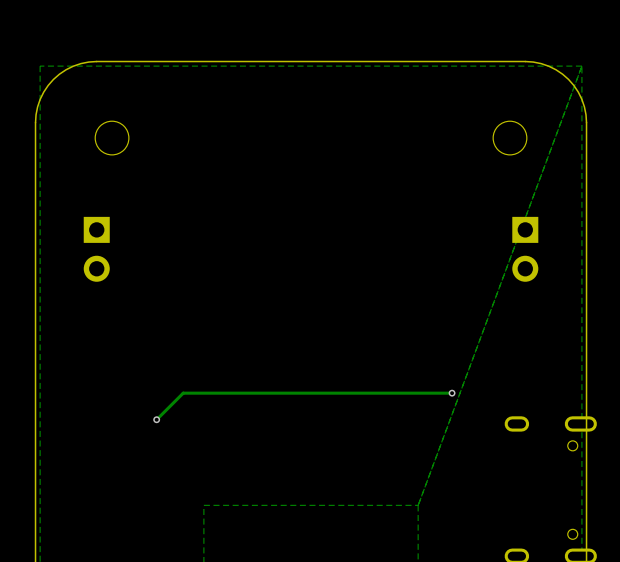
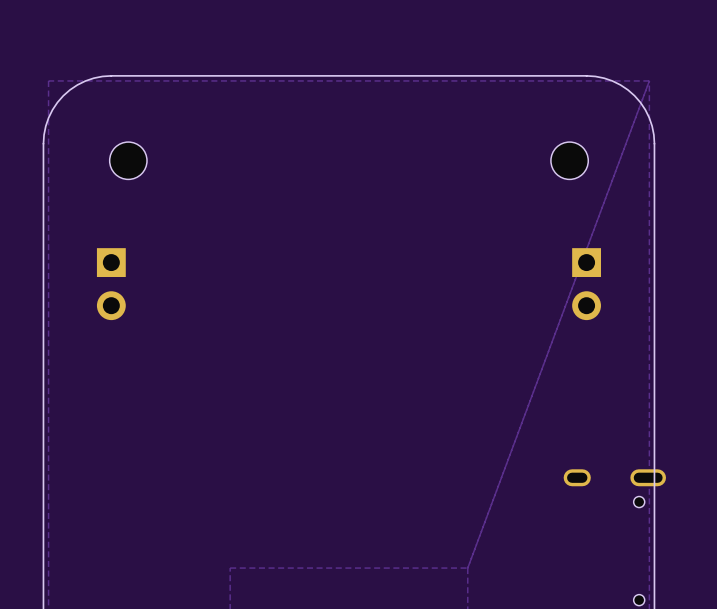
track: (452, 393) (183, 393) (156, 419) -> none
via: (452, 393) -> none
via: (156, 419) -> none

